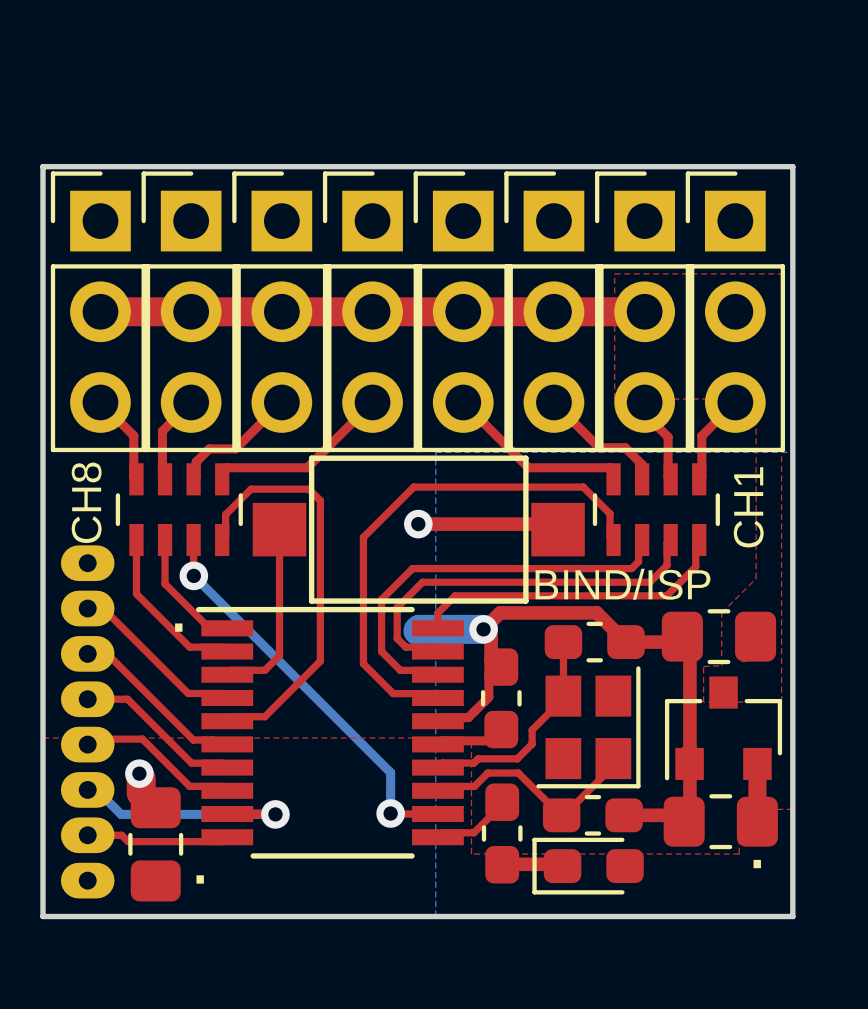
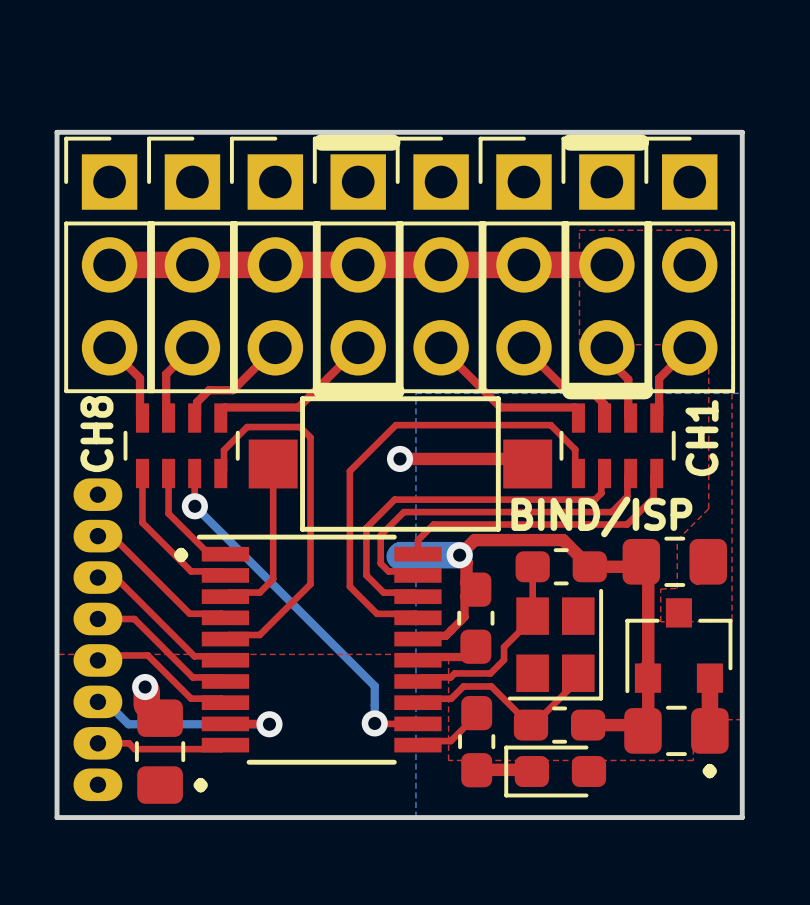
line: none -> (321, 142) (392, 142)
line: none -> (570, 142) (640, 142)
line: none -> (321, 391) (396, 391)
line: none -> (570, 391) (644, 391)

